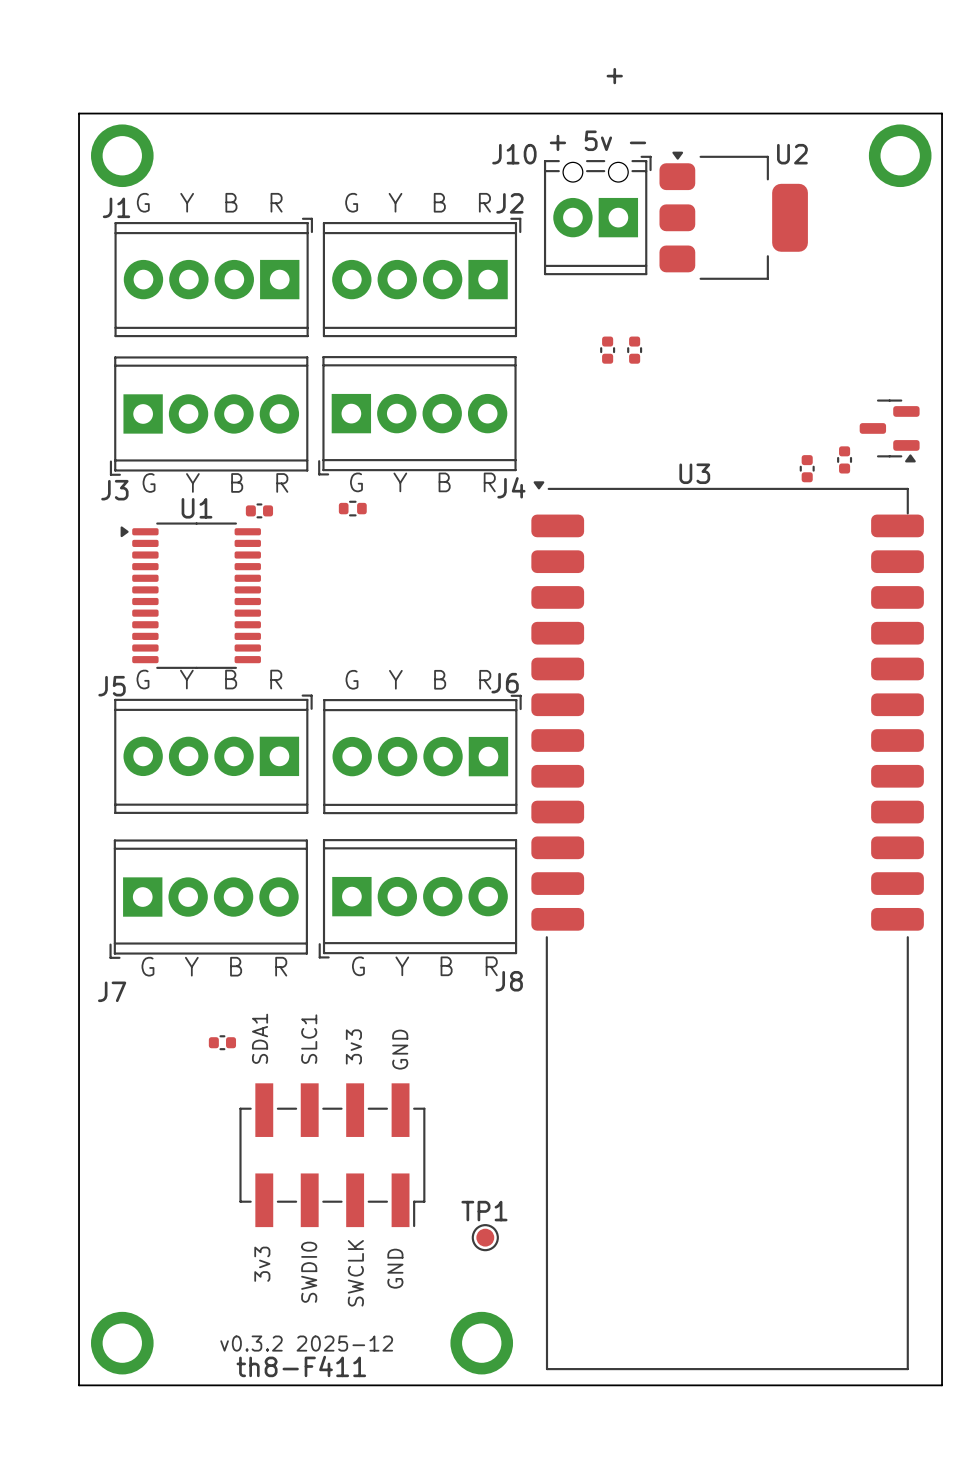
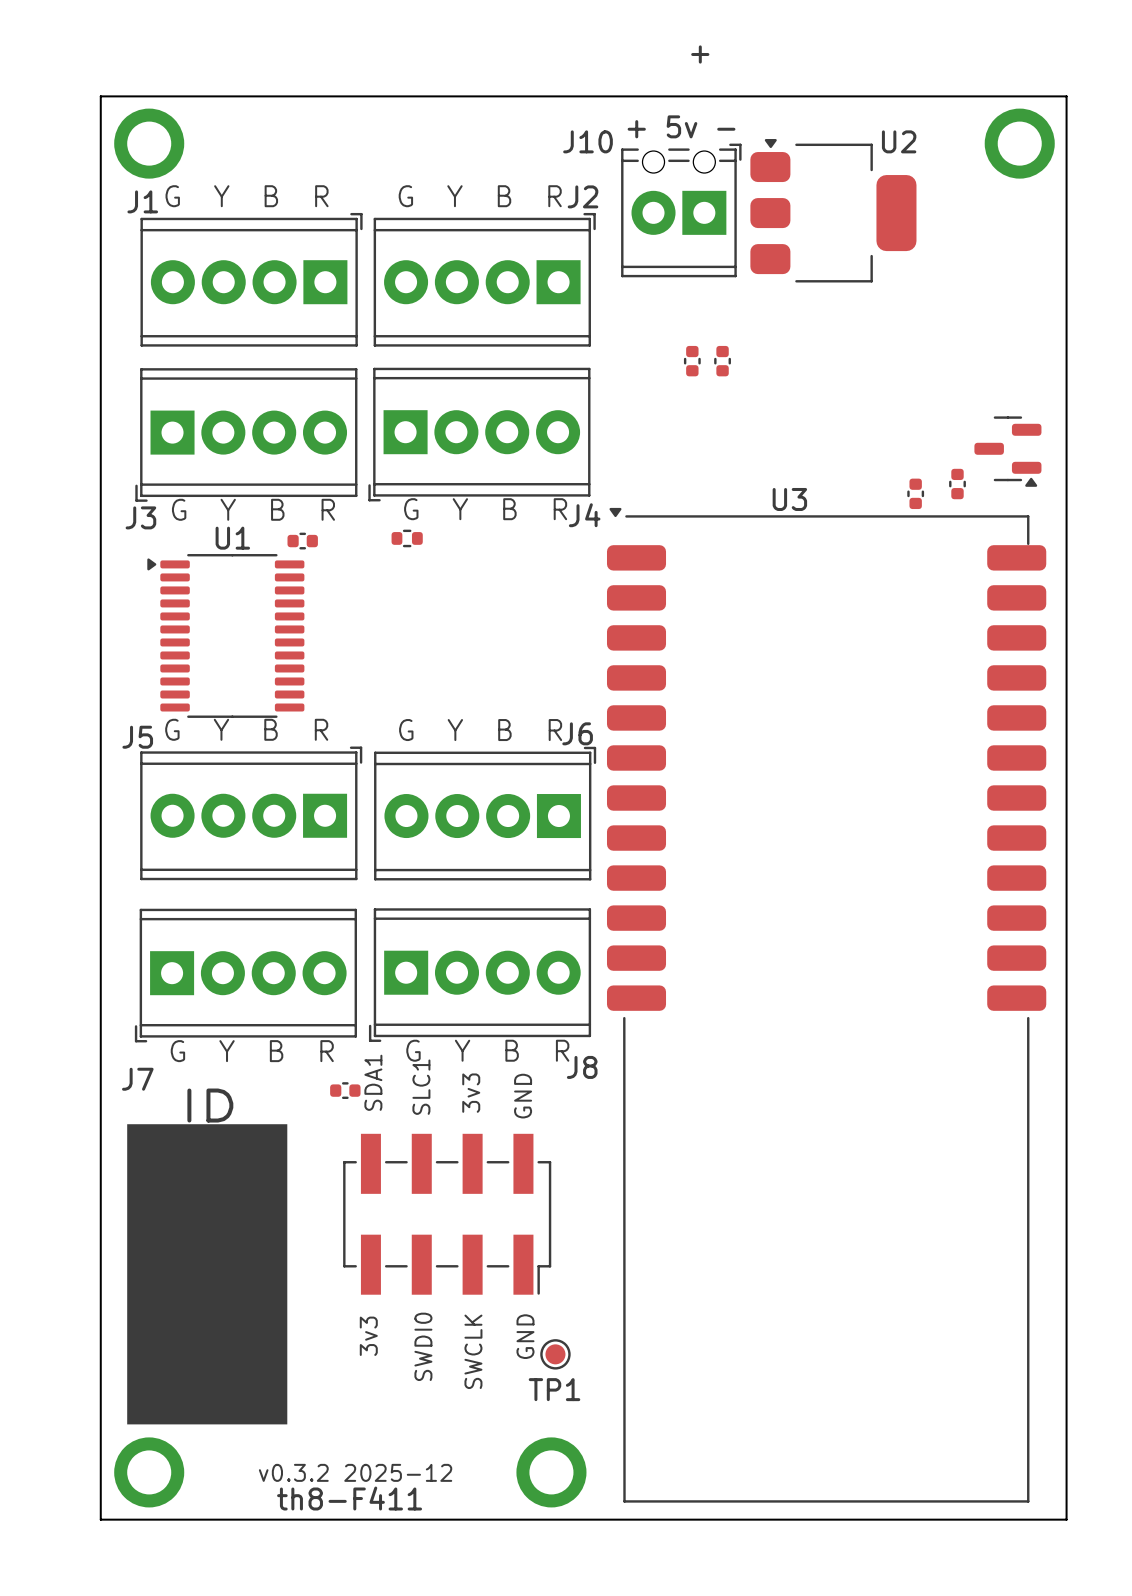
drawing: none -> [127, 1124, 288, 1425]
text position: SDA1 (260, 1038) -> SDA1 (373, 1082)
text position: SLC1 (309, 1039) -> SLC1 (421, 1087)
part position: (222, 1042) -> (345, 1090)
text position: 3v3 (353, 1046) -> 3v3 (471, 1093)
text position: GND (400, 1049) -> GND (523, 1096)
part position: (332, 1155) -> (447, 1214)
TP1 name position: TP1 (484, 1211) -> TP1 (554, 1389)
text position: 3v3 (262, 1264) -> 3v3 (368, 1336)
text position: GND (395, 1268) -> GND (525, 1336)
text position: SWDI0 (309, 1272) -> SWDI0 (423, 1346)
text position: SWCLK (355, 1273) -> SWCLK (473, 1351)

